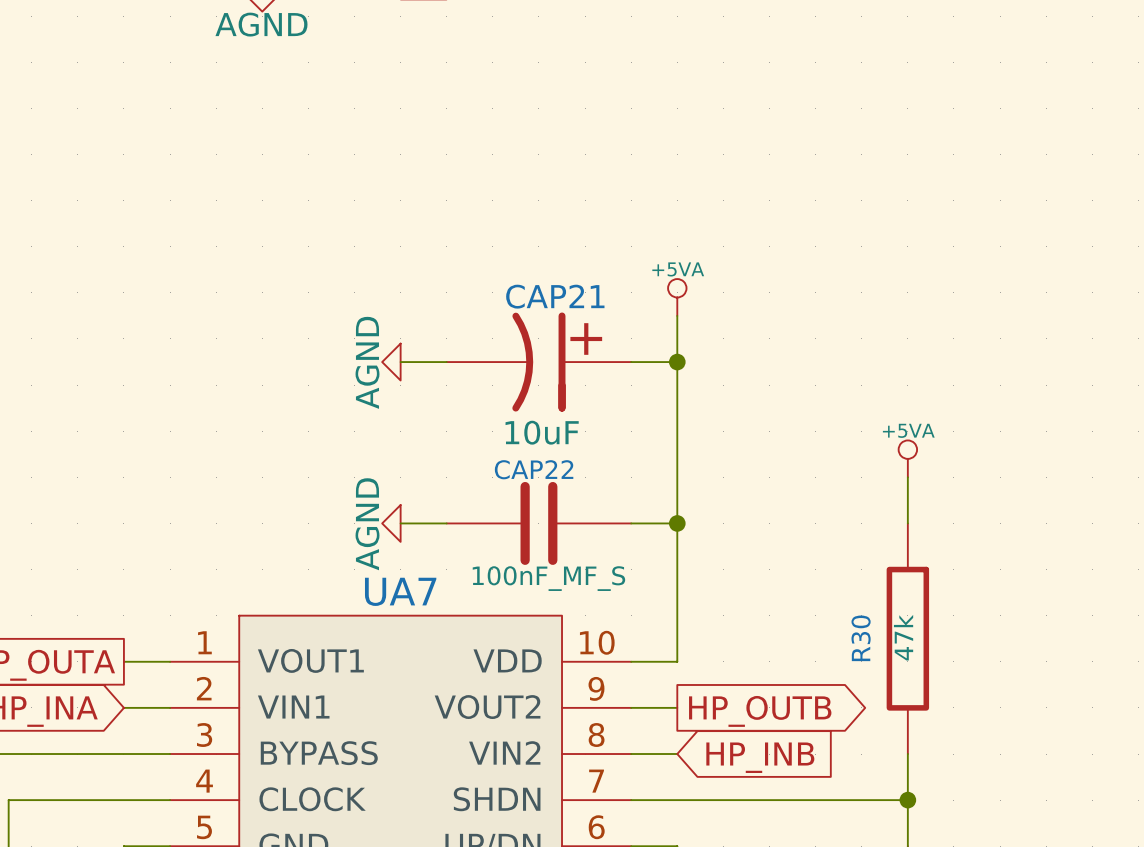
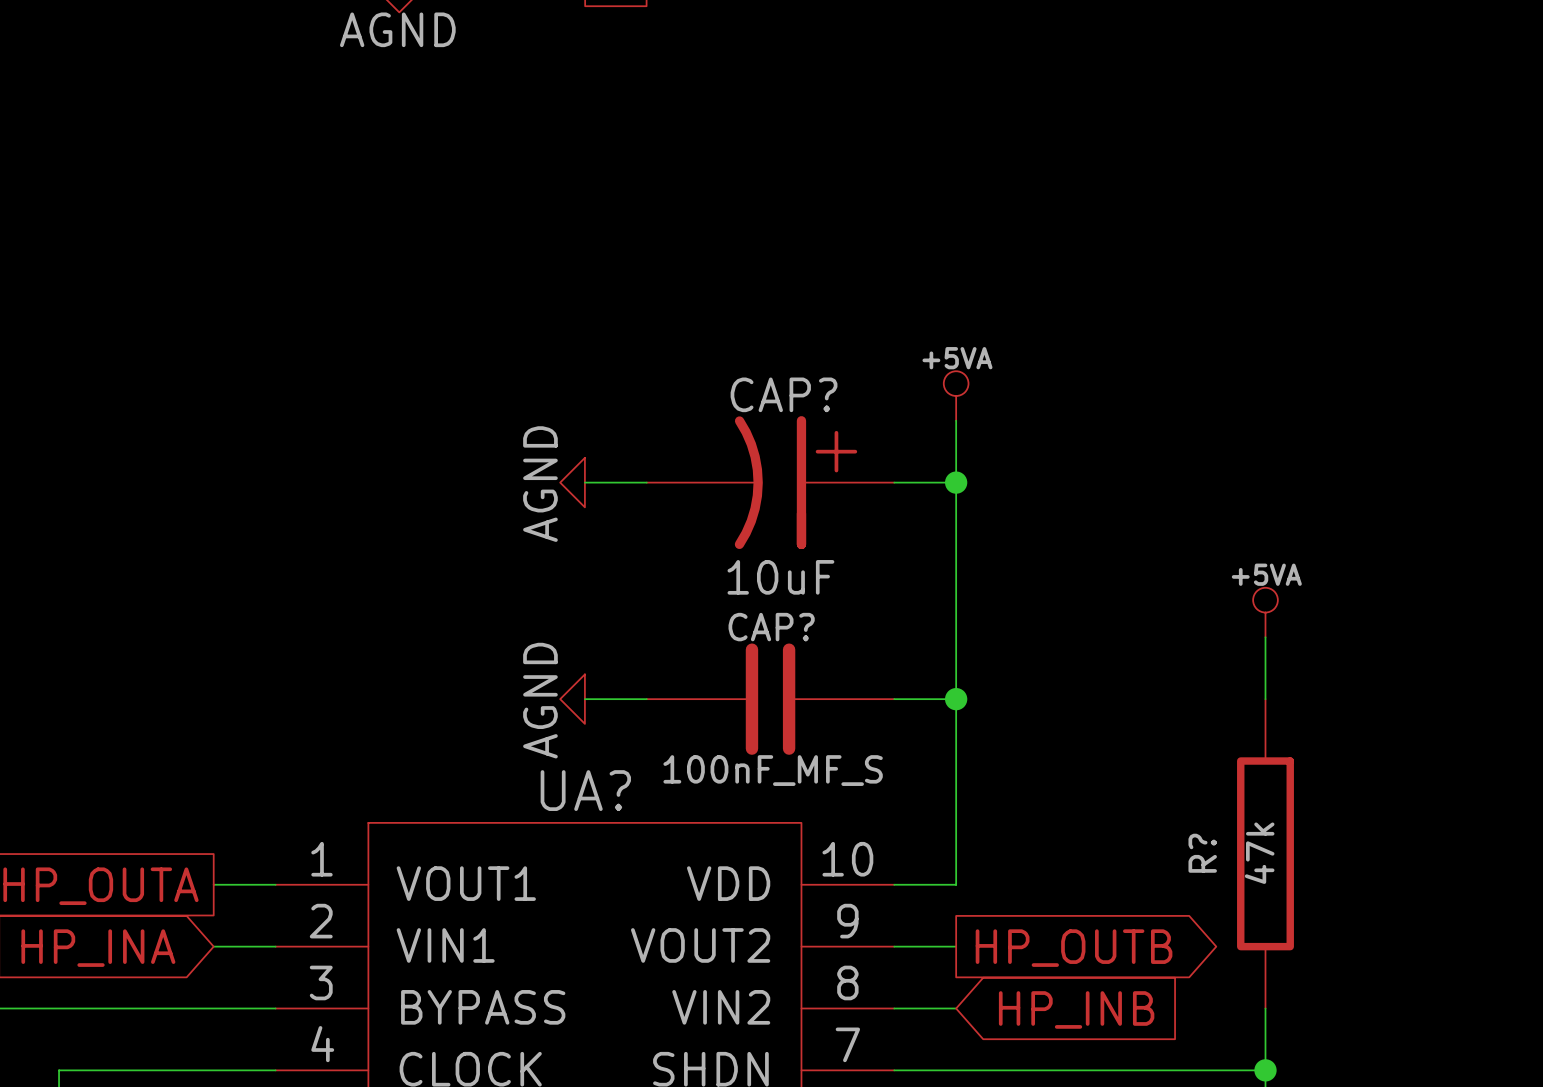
CAP21 name: CAP21 (555, 296) -> CAP? (784, 394)
CAP22 name: CAP22 (534, 469) -> CAP? (771, 627)
UA7 name: UA7 (400, 591) -> UA? (585, 790)
R30 name: R30 (861, 638) -> R? (1202, 853)

